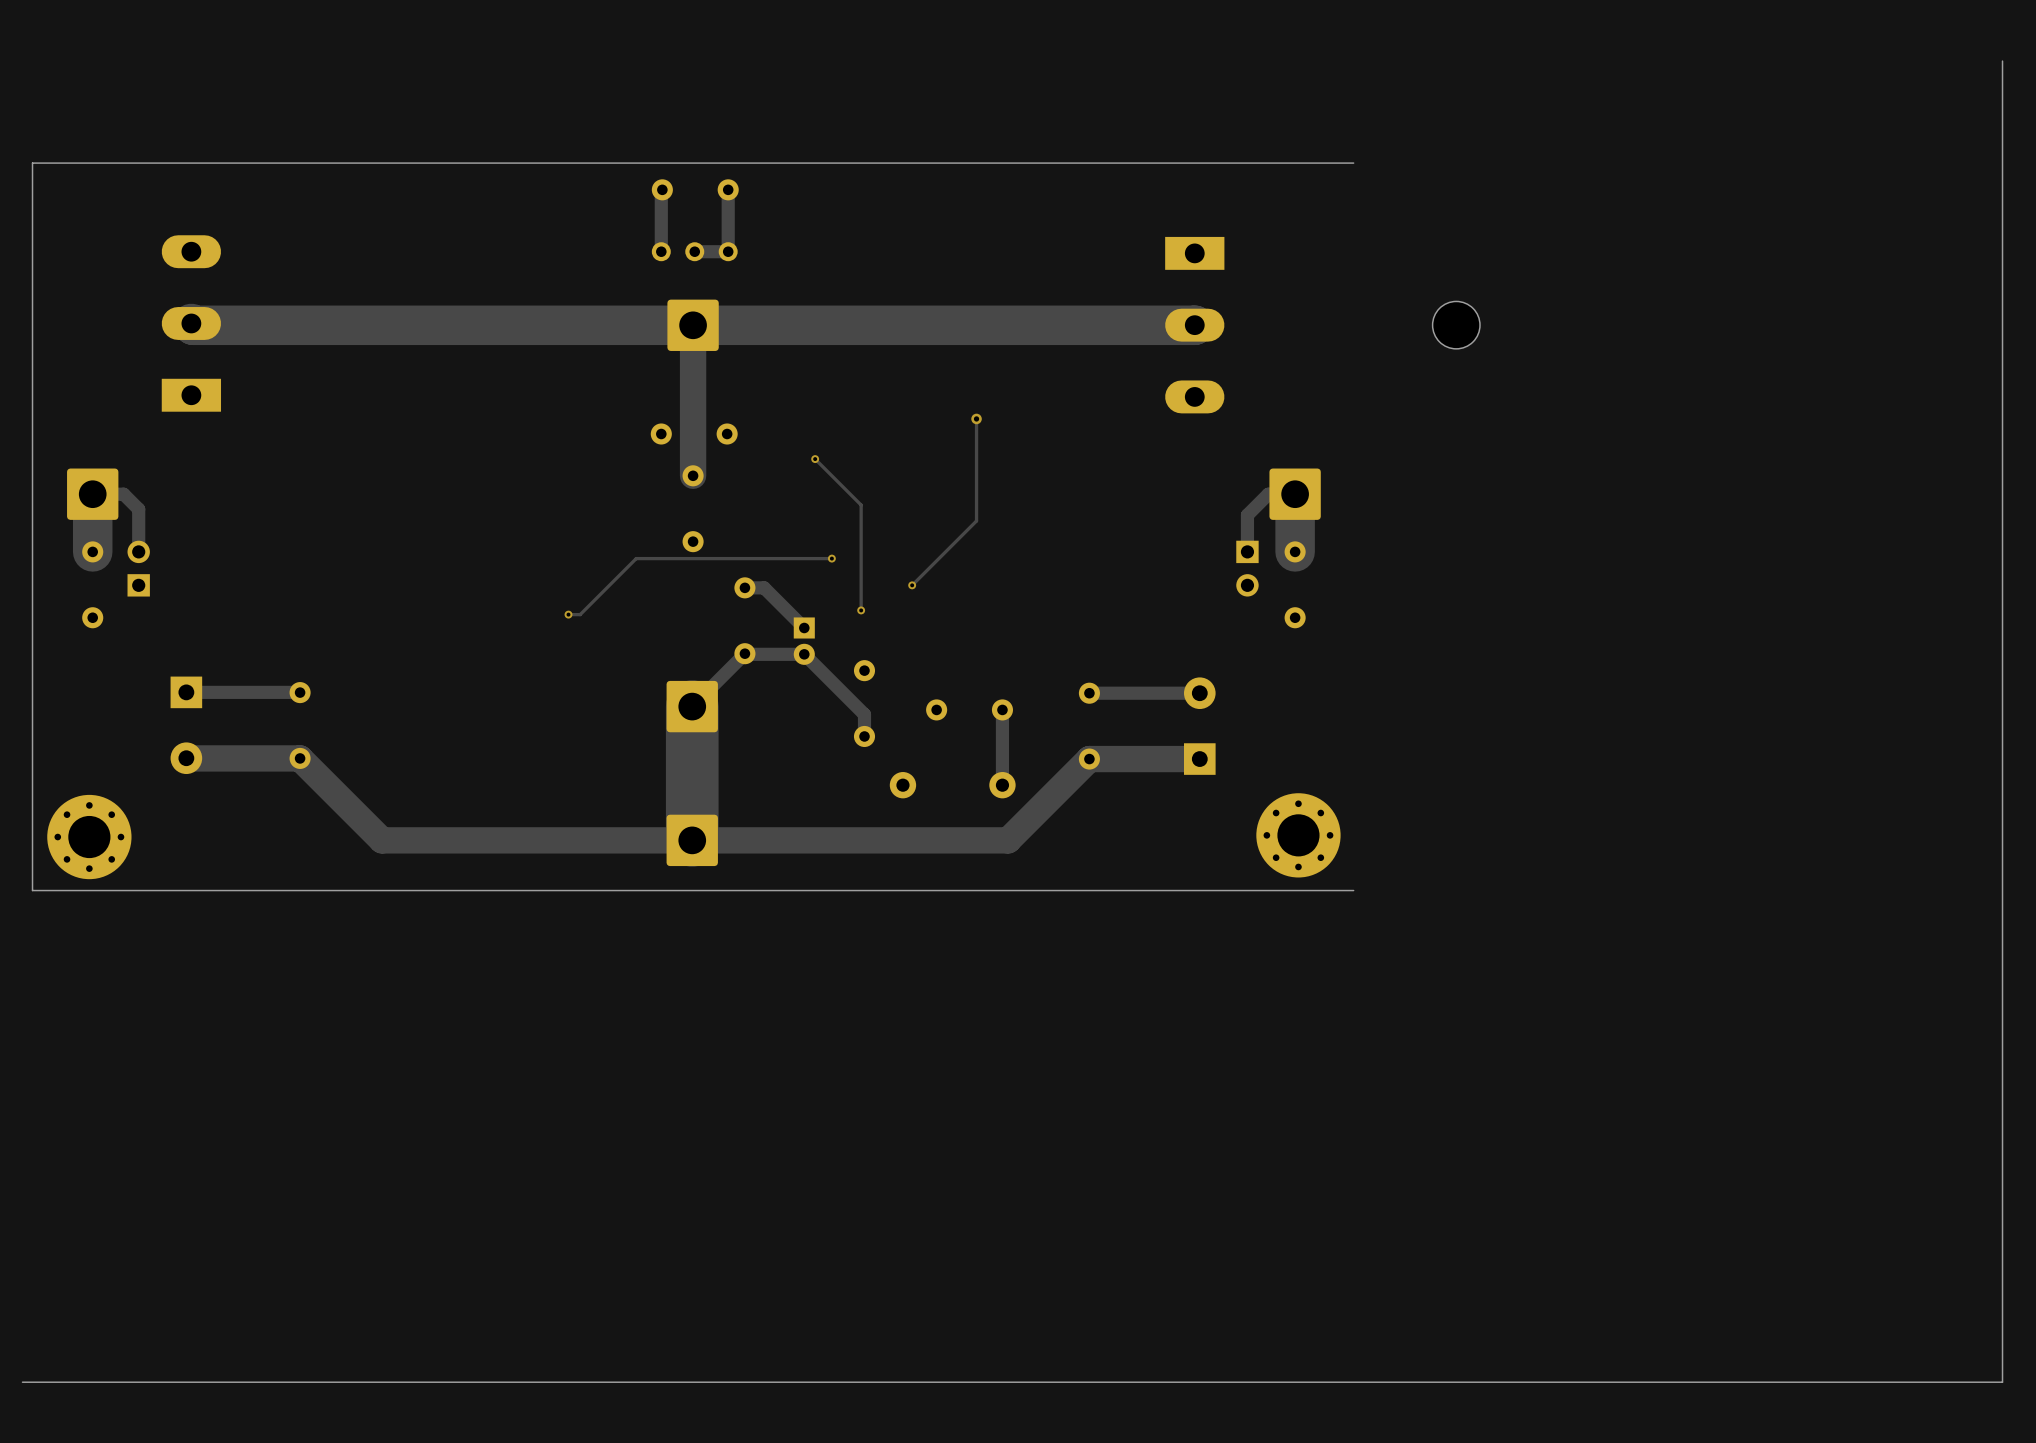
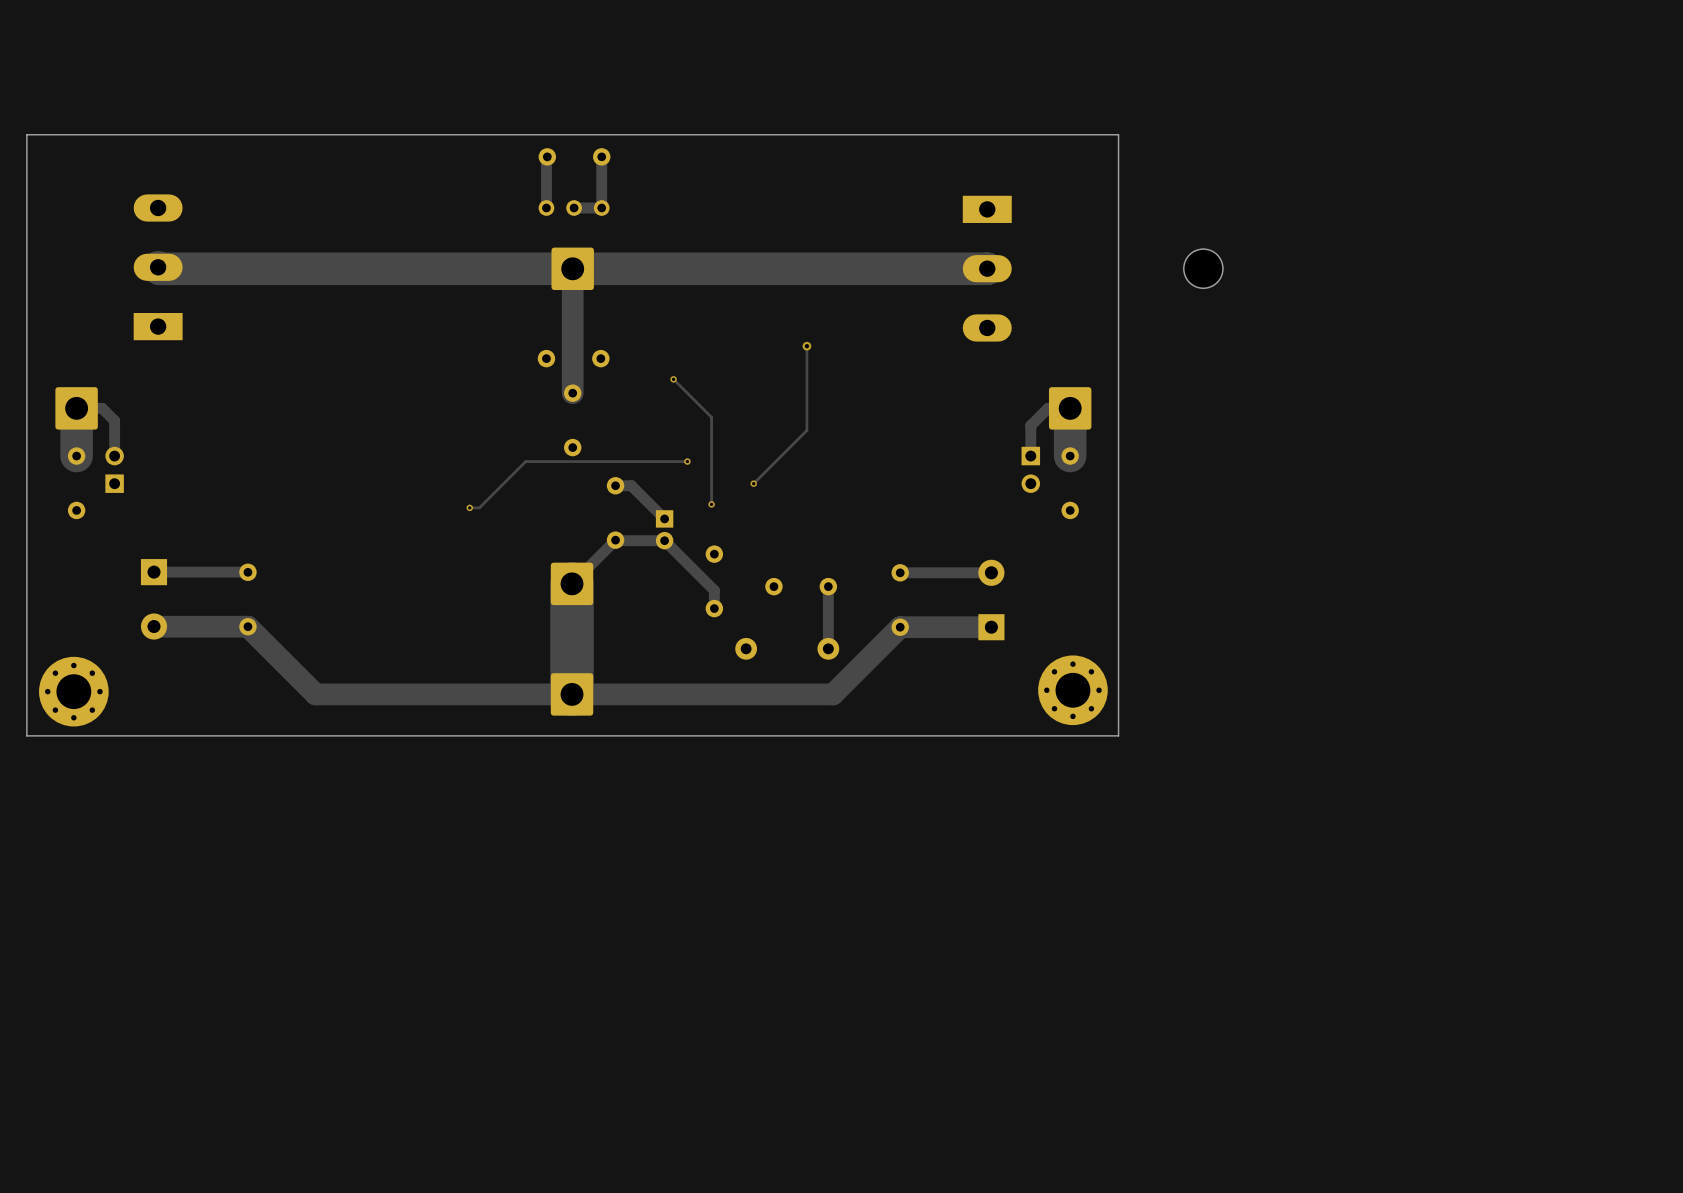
board edge: (2002, 61) (2002, 1382) (22, 1382) -> none
board edge: none -> (1118, 134) (1118, 735)

